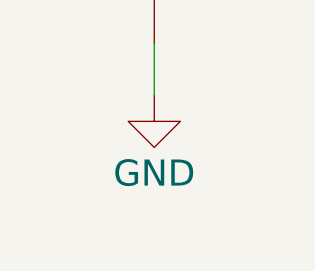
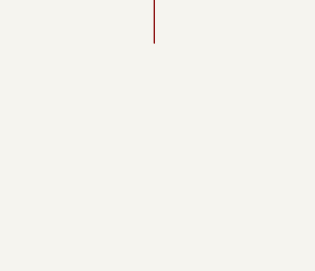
wire: (154, 43) (154, 95) -> none
power symbol: GND (154, 121) -> none

